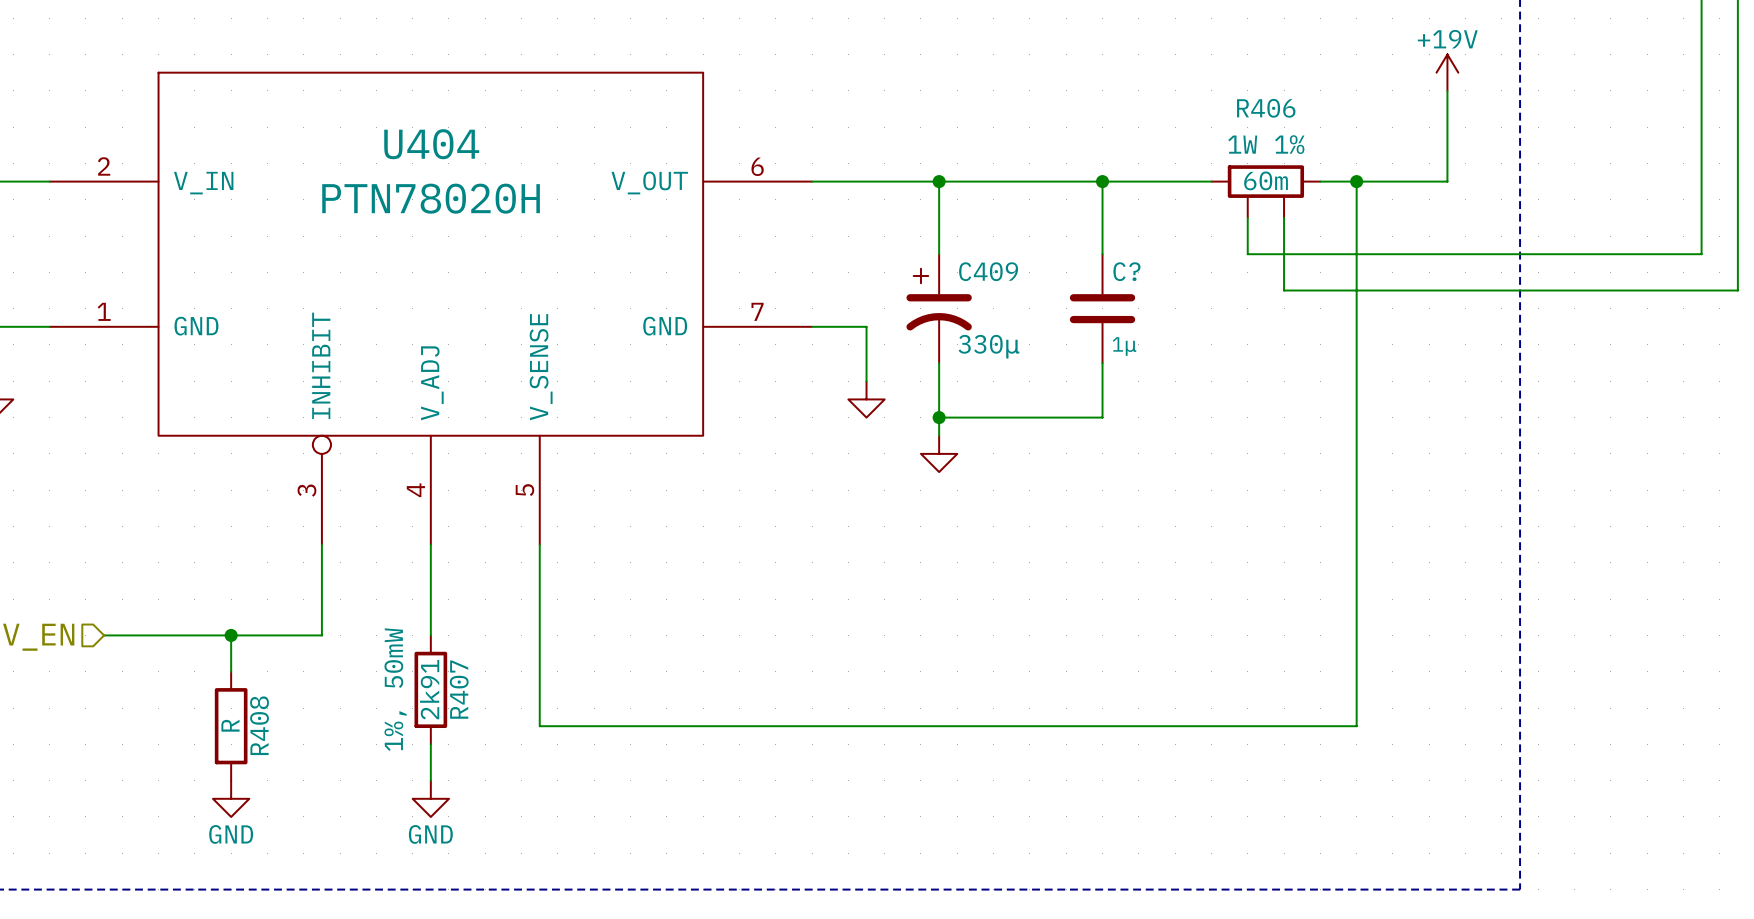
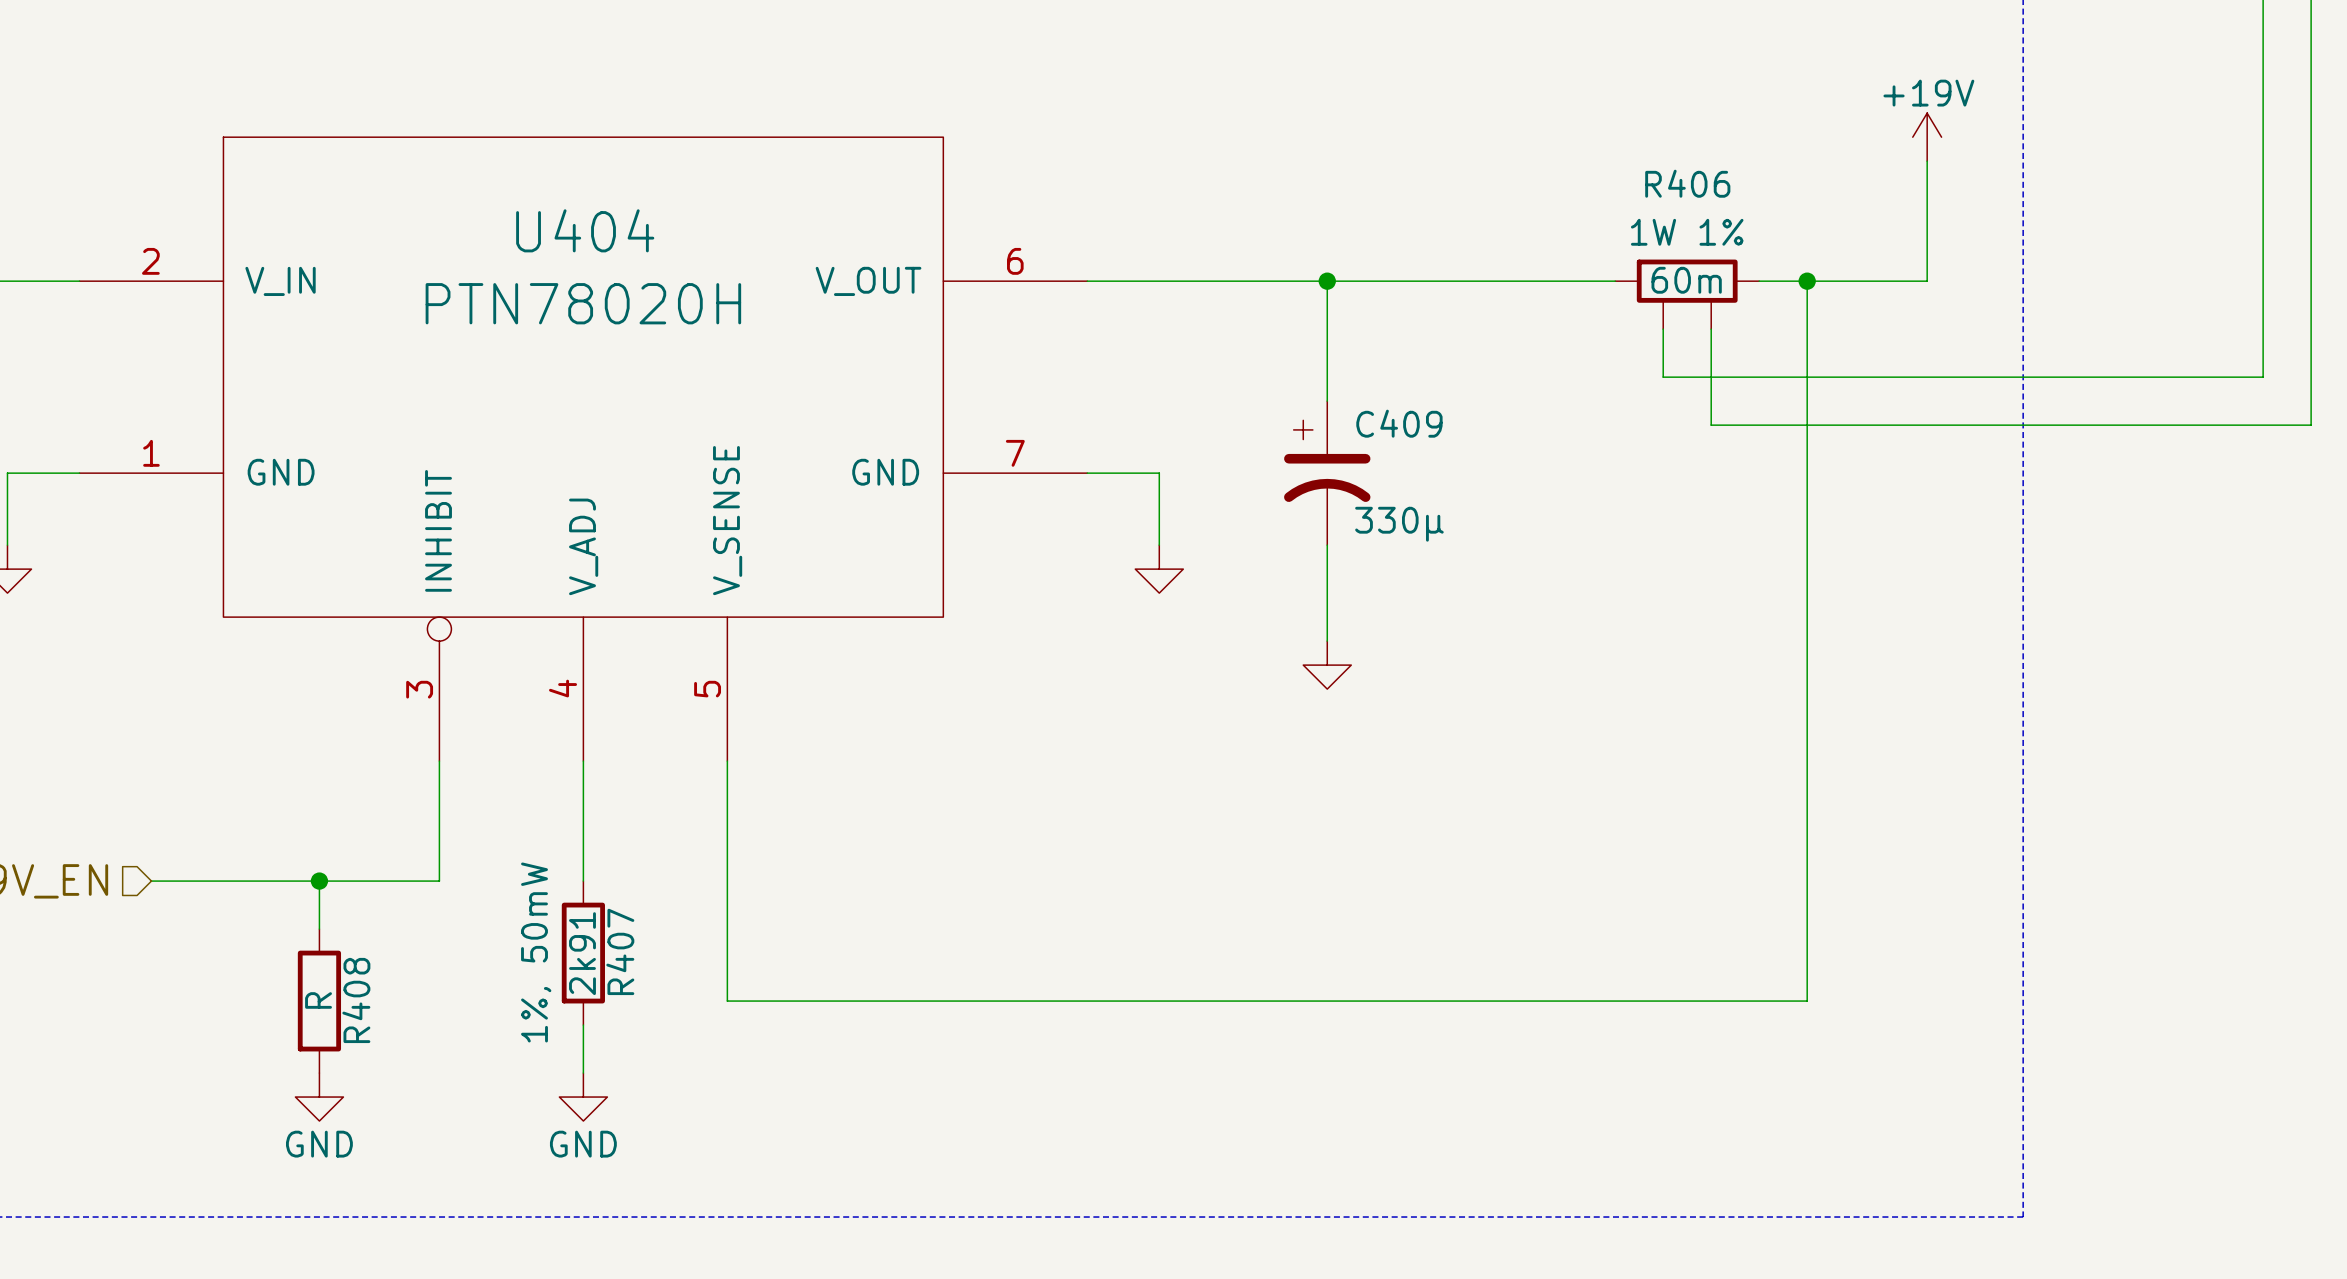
wire: (939, 181) (939, 254) -> none
junction: (939, 181) -> none
wire: none -> (1327, 281) (1327, 401)
junction: none -> (1327, 281)
wire: (1102, 181) (1102, 254) -> none
junction: (1102, 181) -> none
C409 position: (939, 308) -> (1327, 473)
C?: 1μ (1102, 308) -> none
wire: (939, 363) (939, 435) -> (1327, 545) (1327, 641)
wire: (1102, 363) (1102, 417) (939, 417) -> none
junction: (939, 417) -> none
power symbol position: (939, 453) -> (1327, 665)

